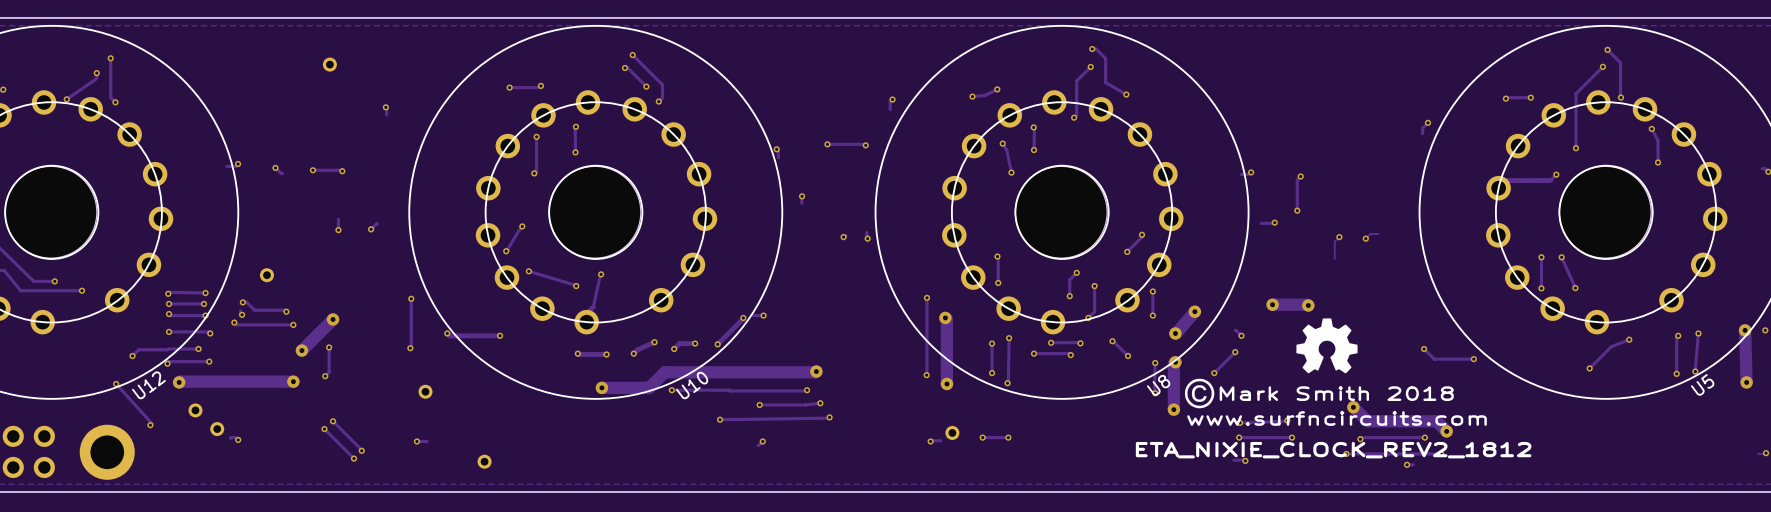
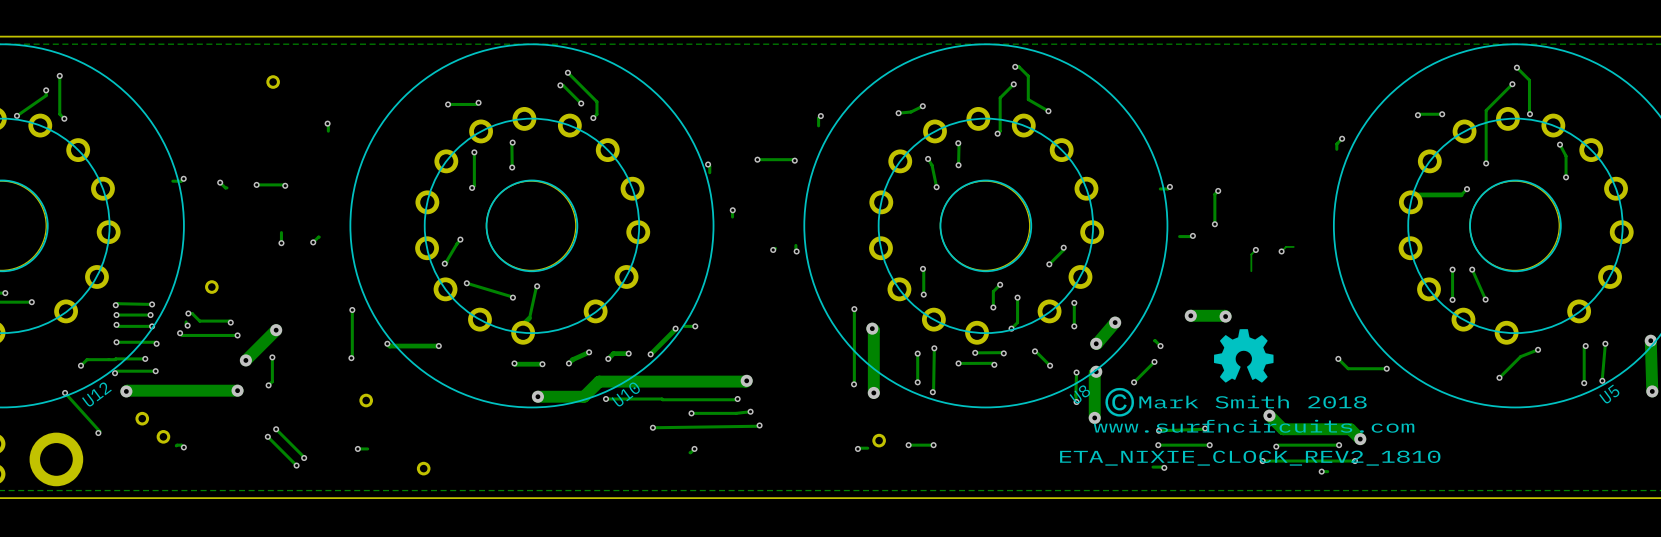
text: ETA_NIXIE_CLOCK_REV2_1812 (1333, 450) -> ETA_NIXIE_CLOCK_REV2_1810 (1250, 458)

